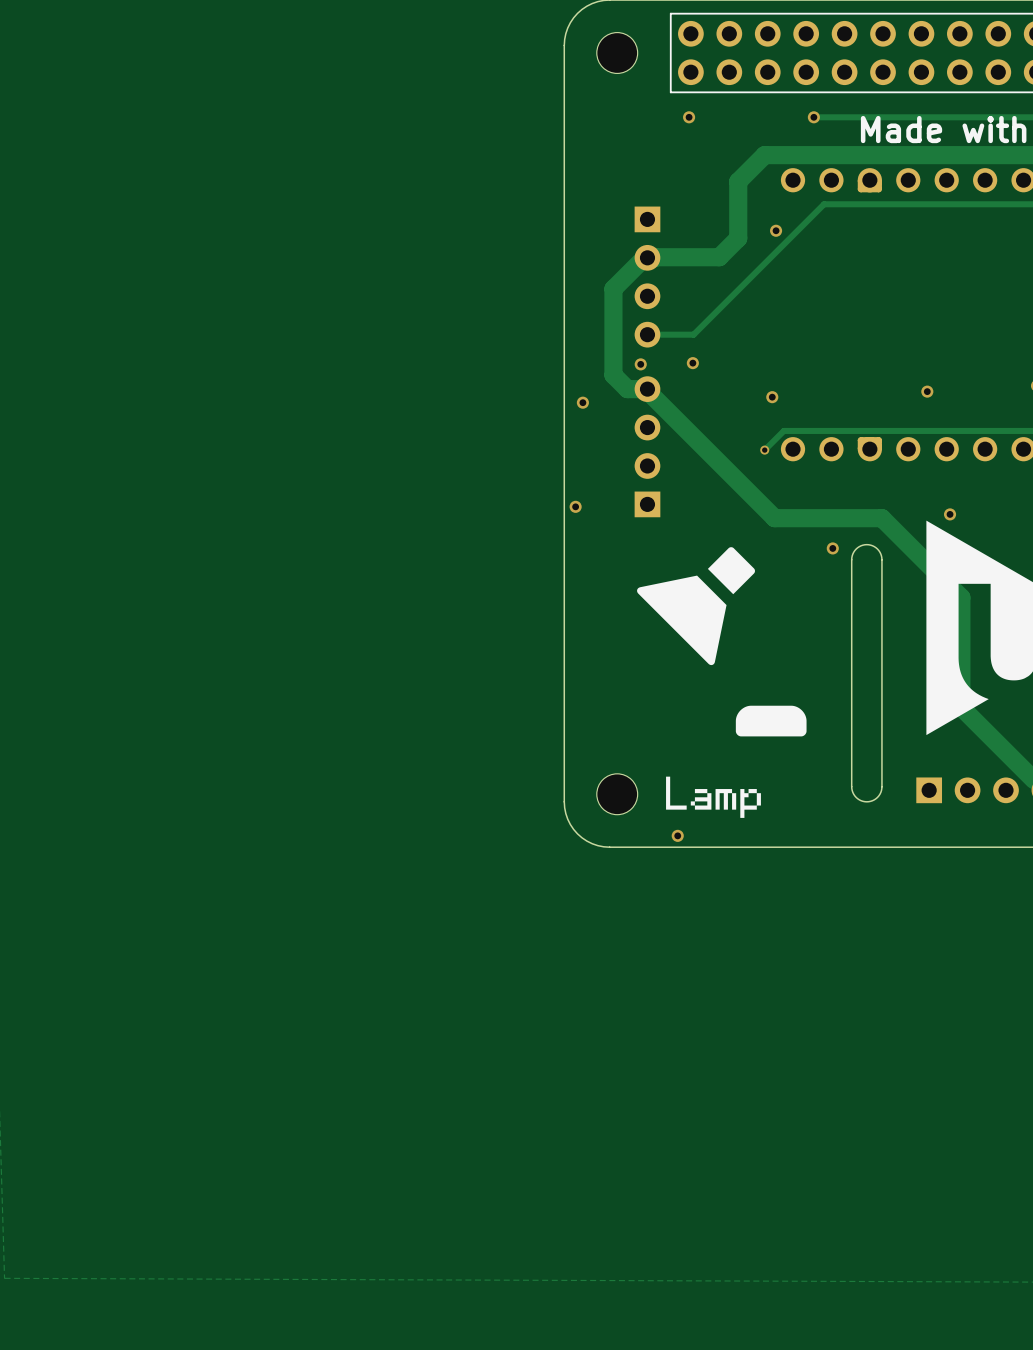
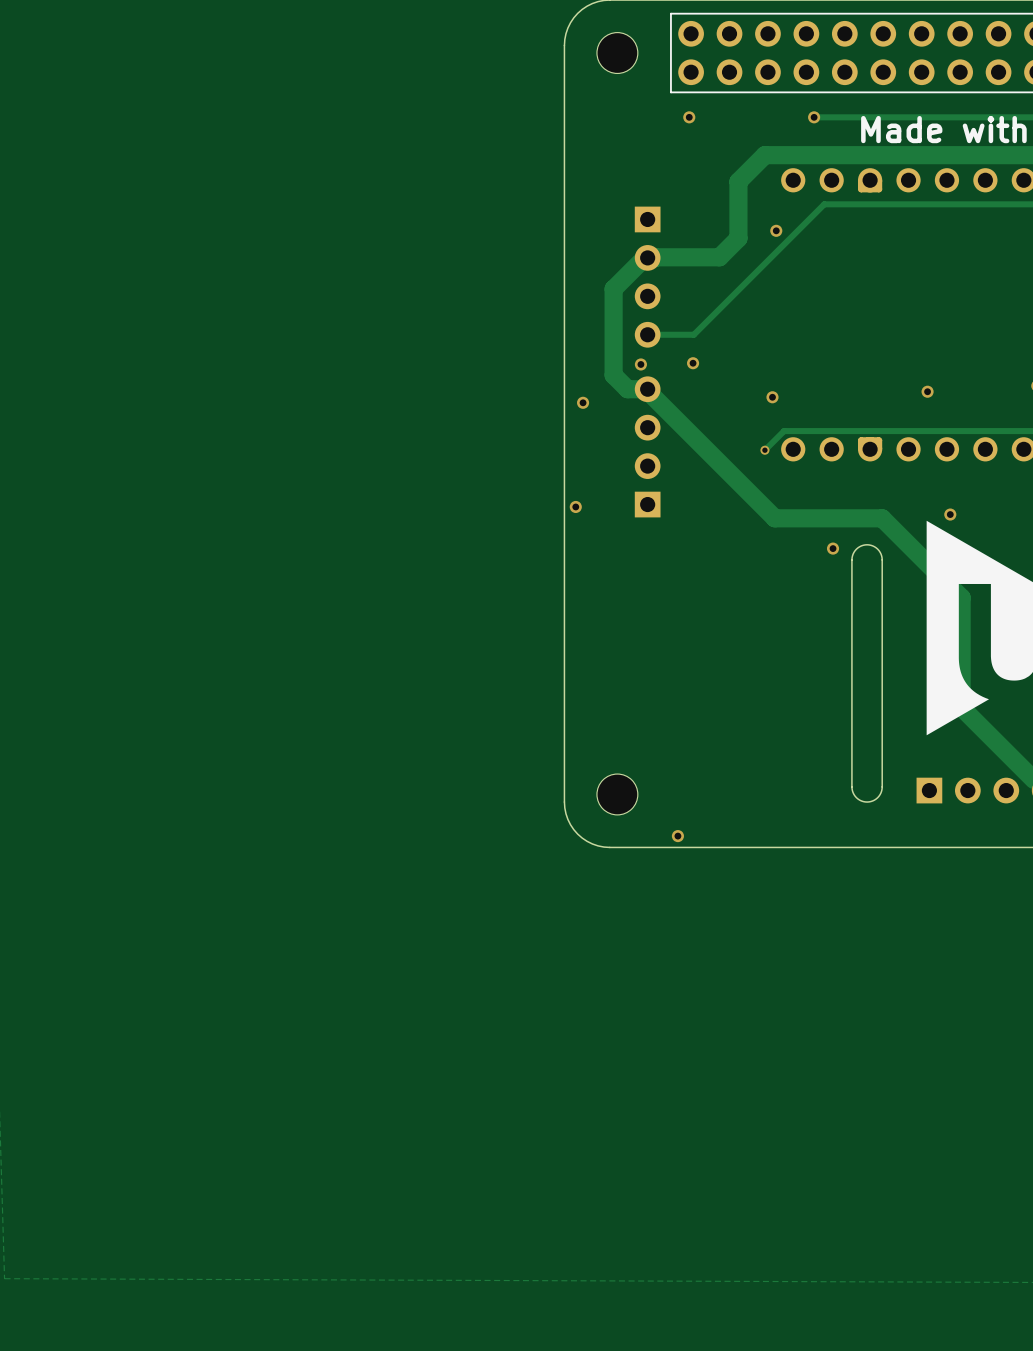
drawing: [637, 547, 755, 666] -> none
drawing: [735, 705, 807, 737] -> none
drawing: [666, 776, 761, 818] -> none

